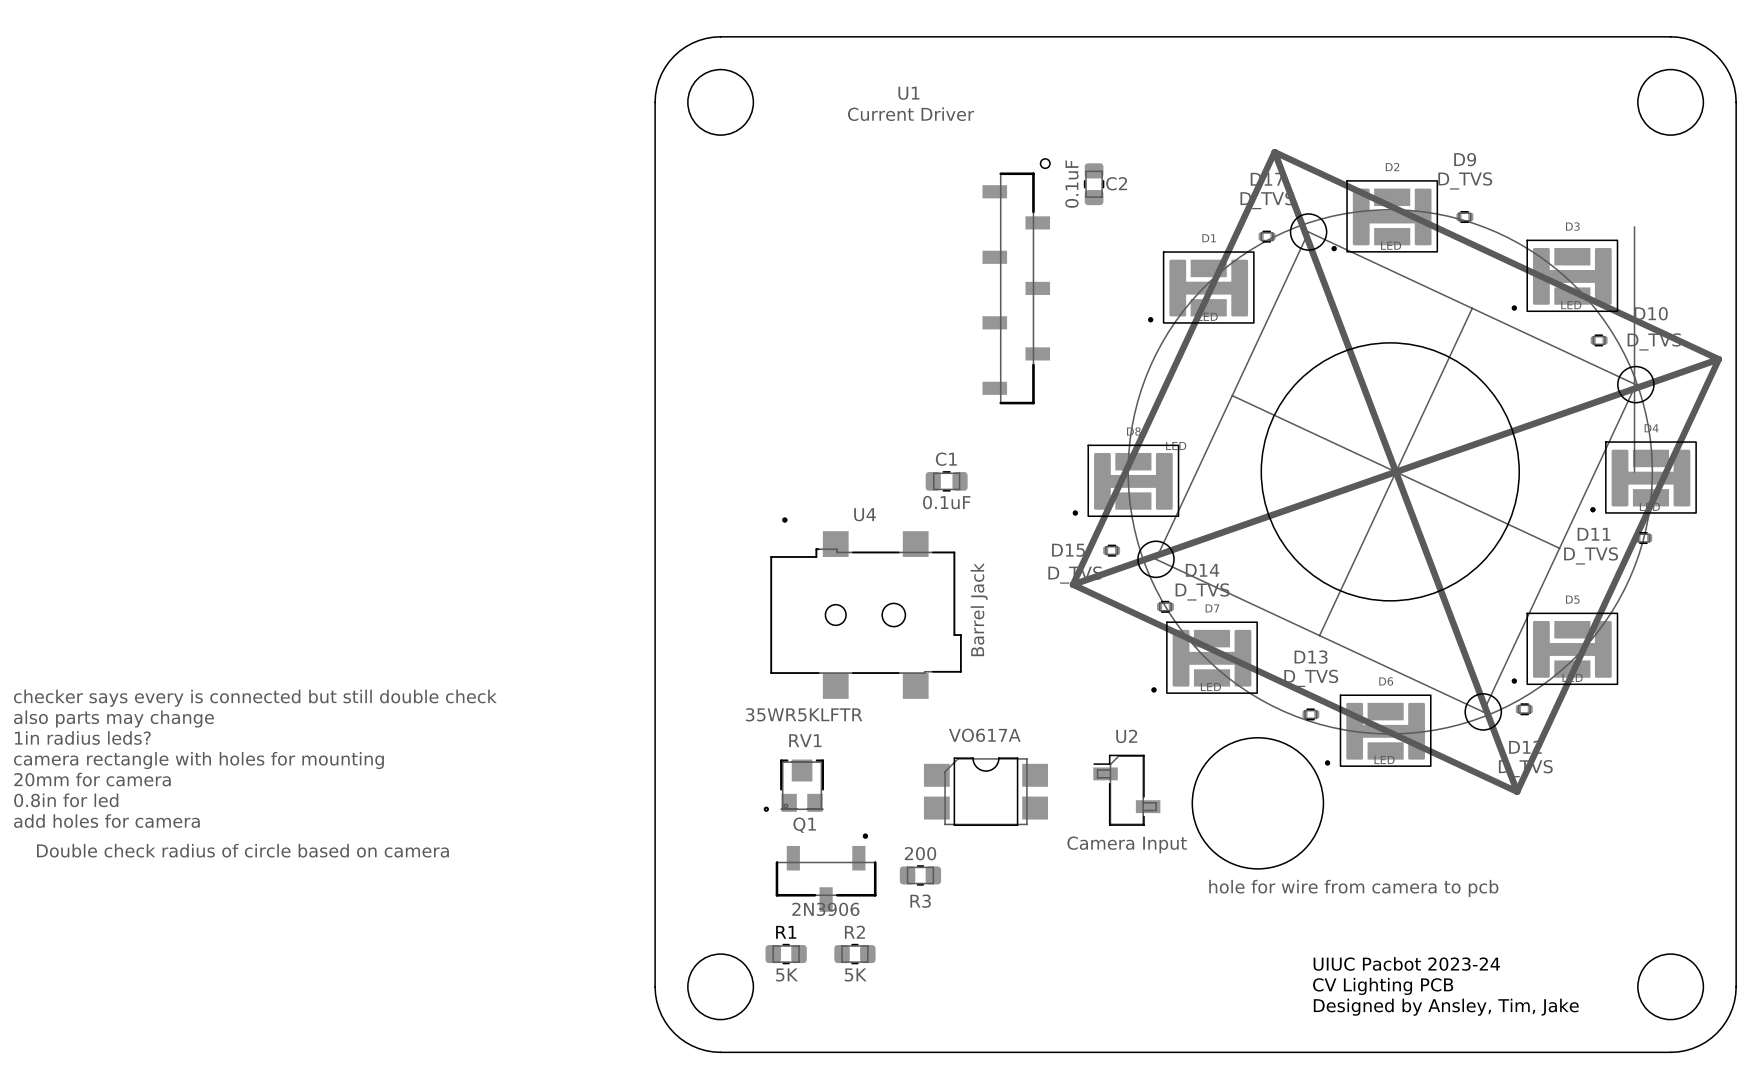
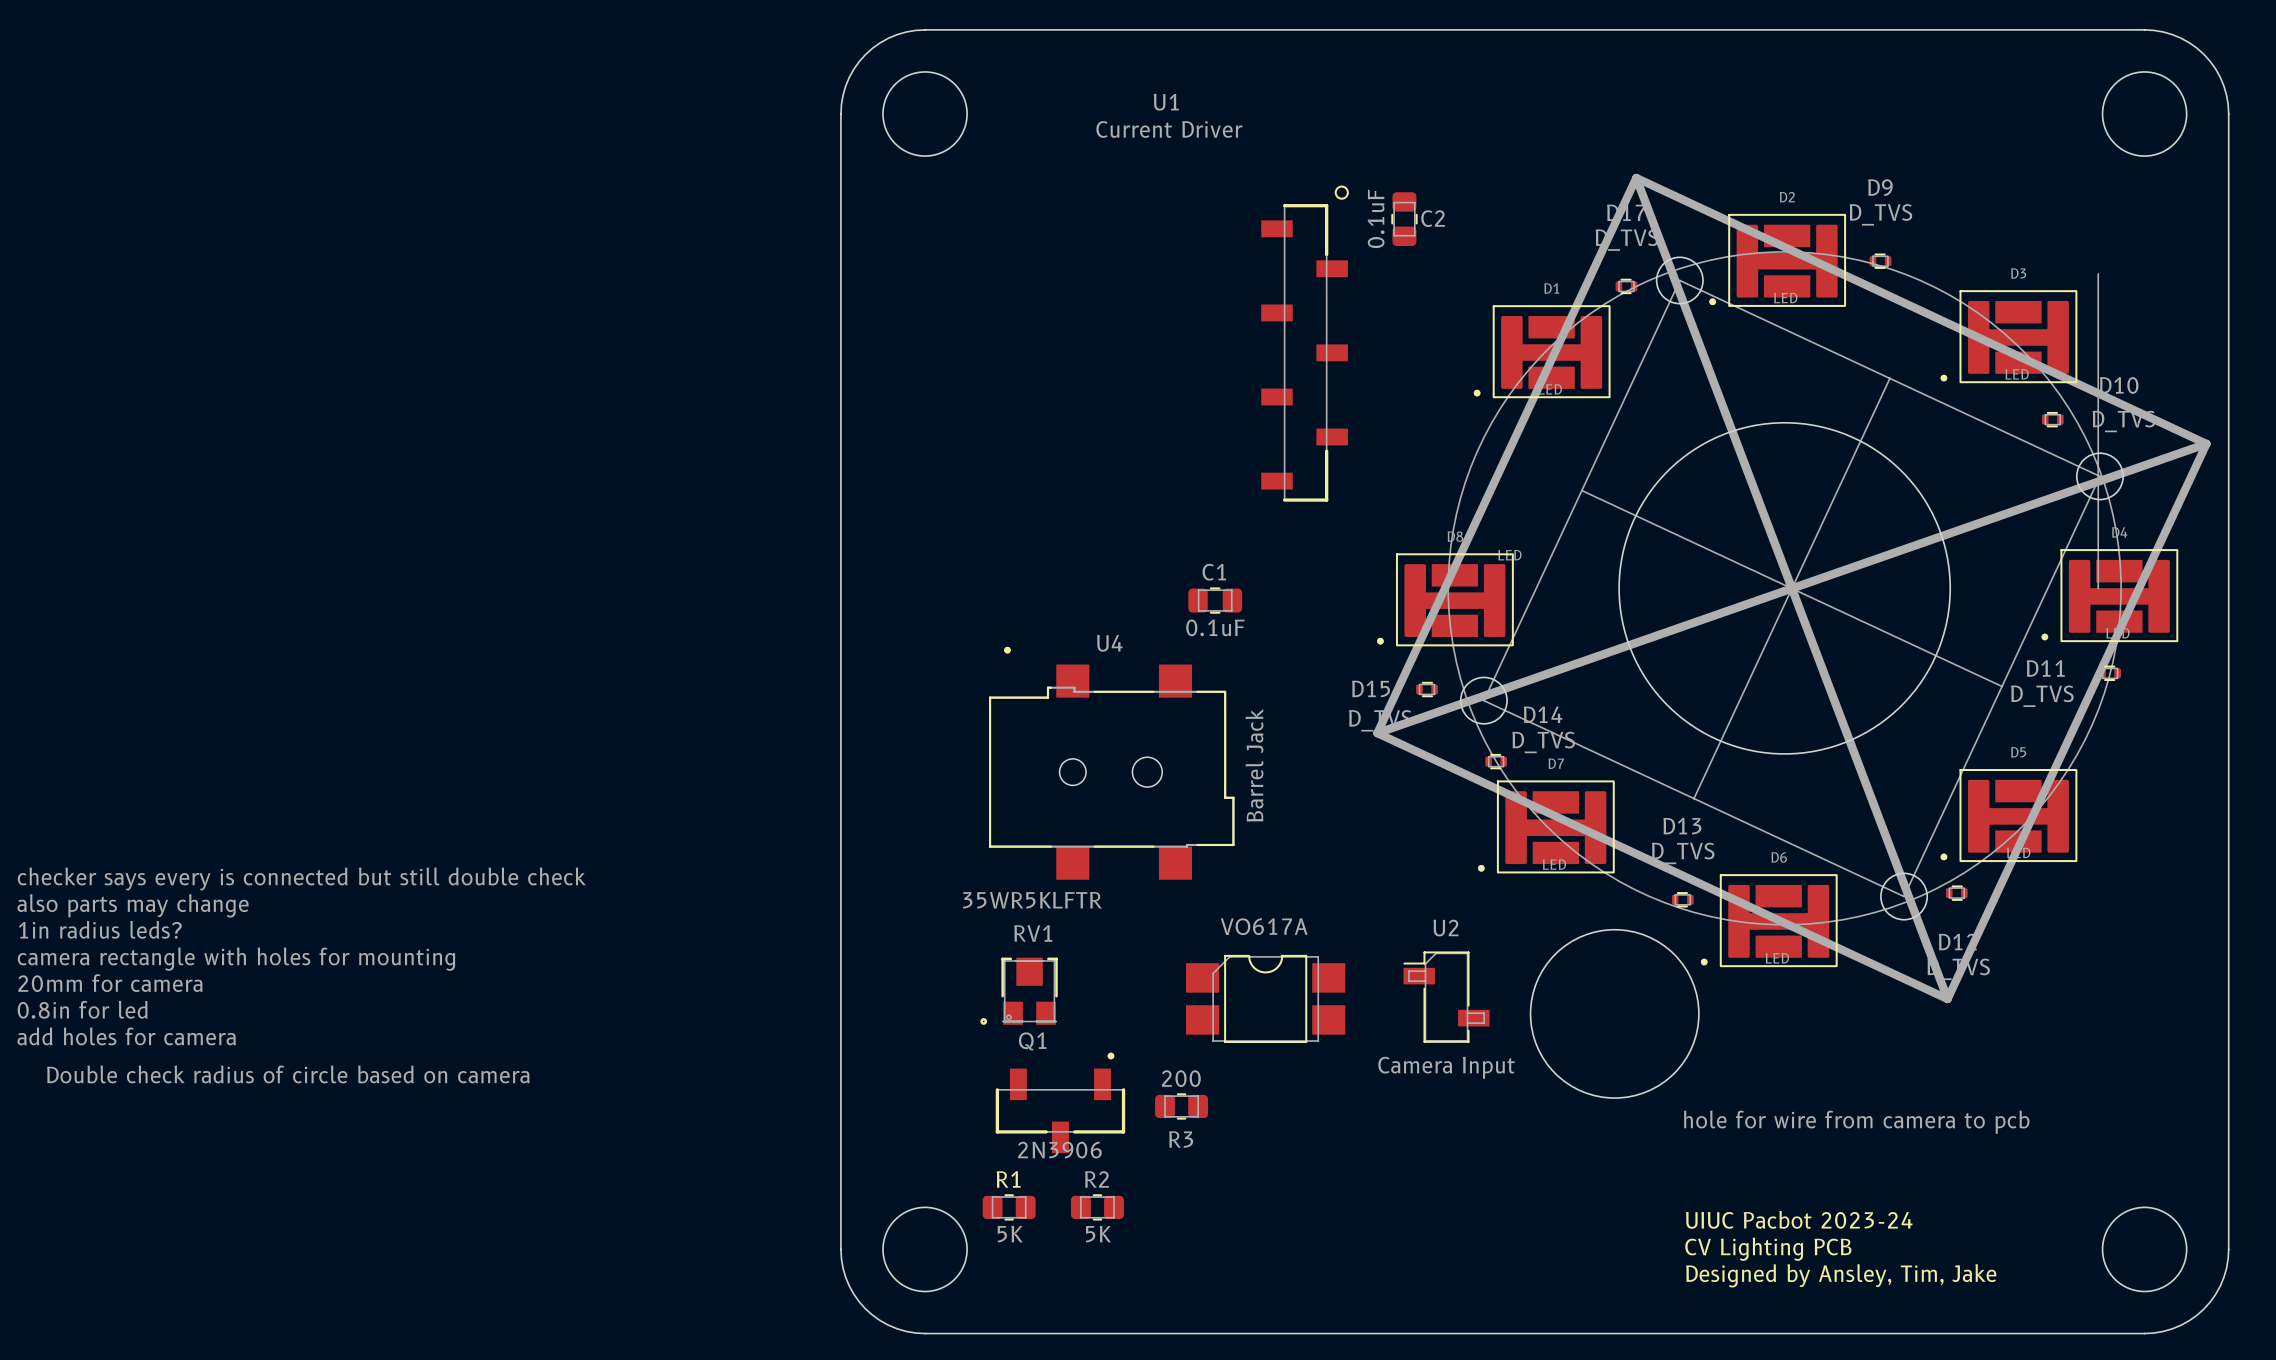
text position: hole for wire from camera to pcb (1353, 888) -> hole for wire from camera to pcb (1856, 1122)

